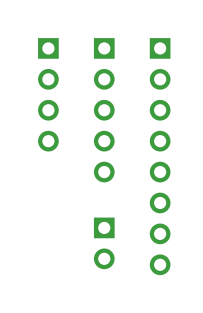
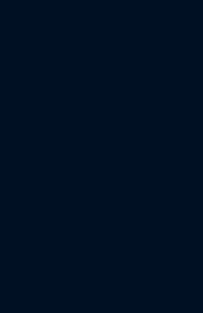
part: (48, 94) -> none
part: (104, 110) -> none
part: (160, 156) -> none
part: (104, 243) -> none

